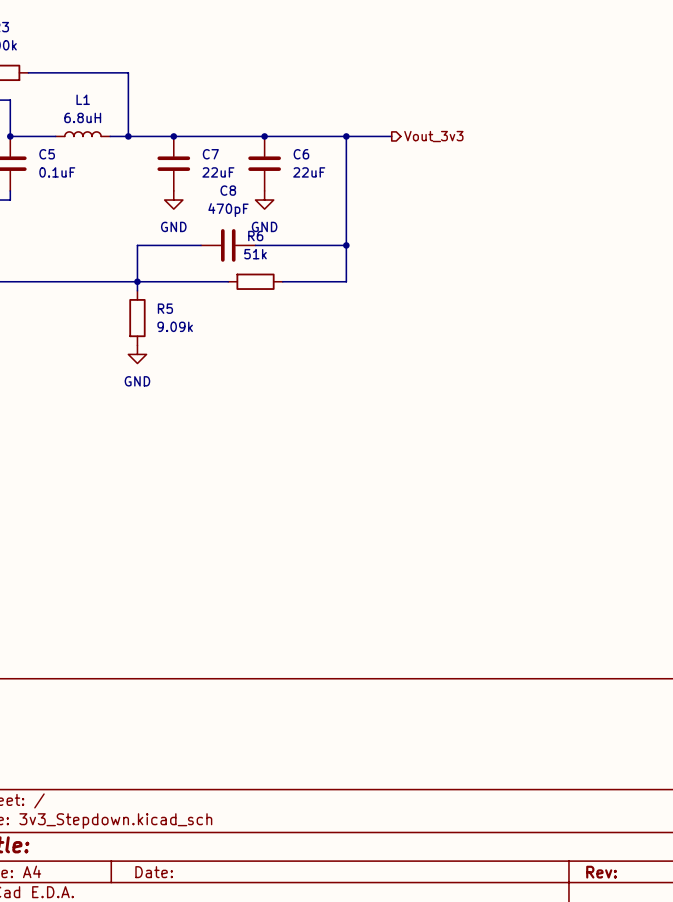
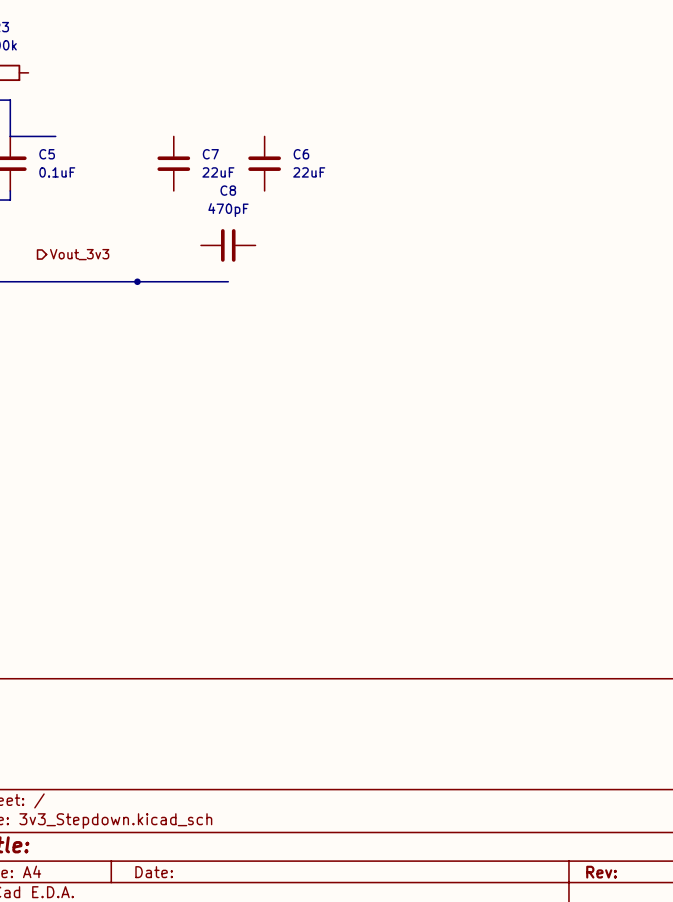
wire: (28, 72) (128, 72) (128, 136) -> none
L1: 6.8uH (82, 134) -> none
junction: (10, 136) -> none
wire: (110, 136) (391, 136) -> none
junction: (128, 136) -> none
junction: (173, 136) -> none
junction: (264, 136) -> none
wire: (346, 136) (346, 281) (282, 281) -> none
junction: (346, 136) -> none
hierarchical label: Vout_3v3 (433, 136) -> none
power symbol: GND (173, 200) -> none
power symbol: GND (264, 200) -> none
wire: (201, 245) (137, 245) (137, 290) -> none
wire: (255, 245) (346, 245) -> none
junction: (346, 245) -> none
hierarchical label: none -> Vout_3v3 (79, 254)
R6: 51k (255, 281) -> none
R5: 9.09k (137, 318) -> none
power symbol: GND (137, 354) -> none

